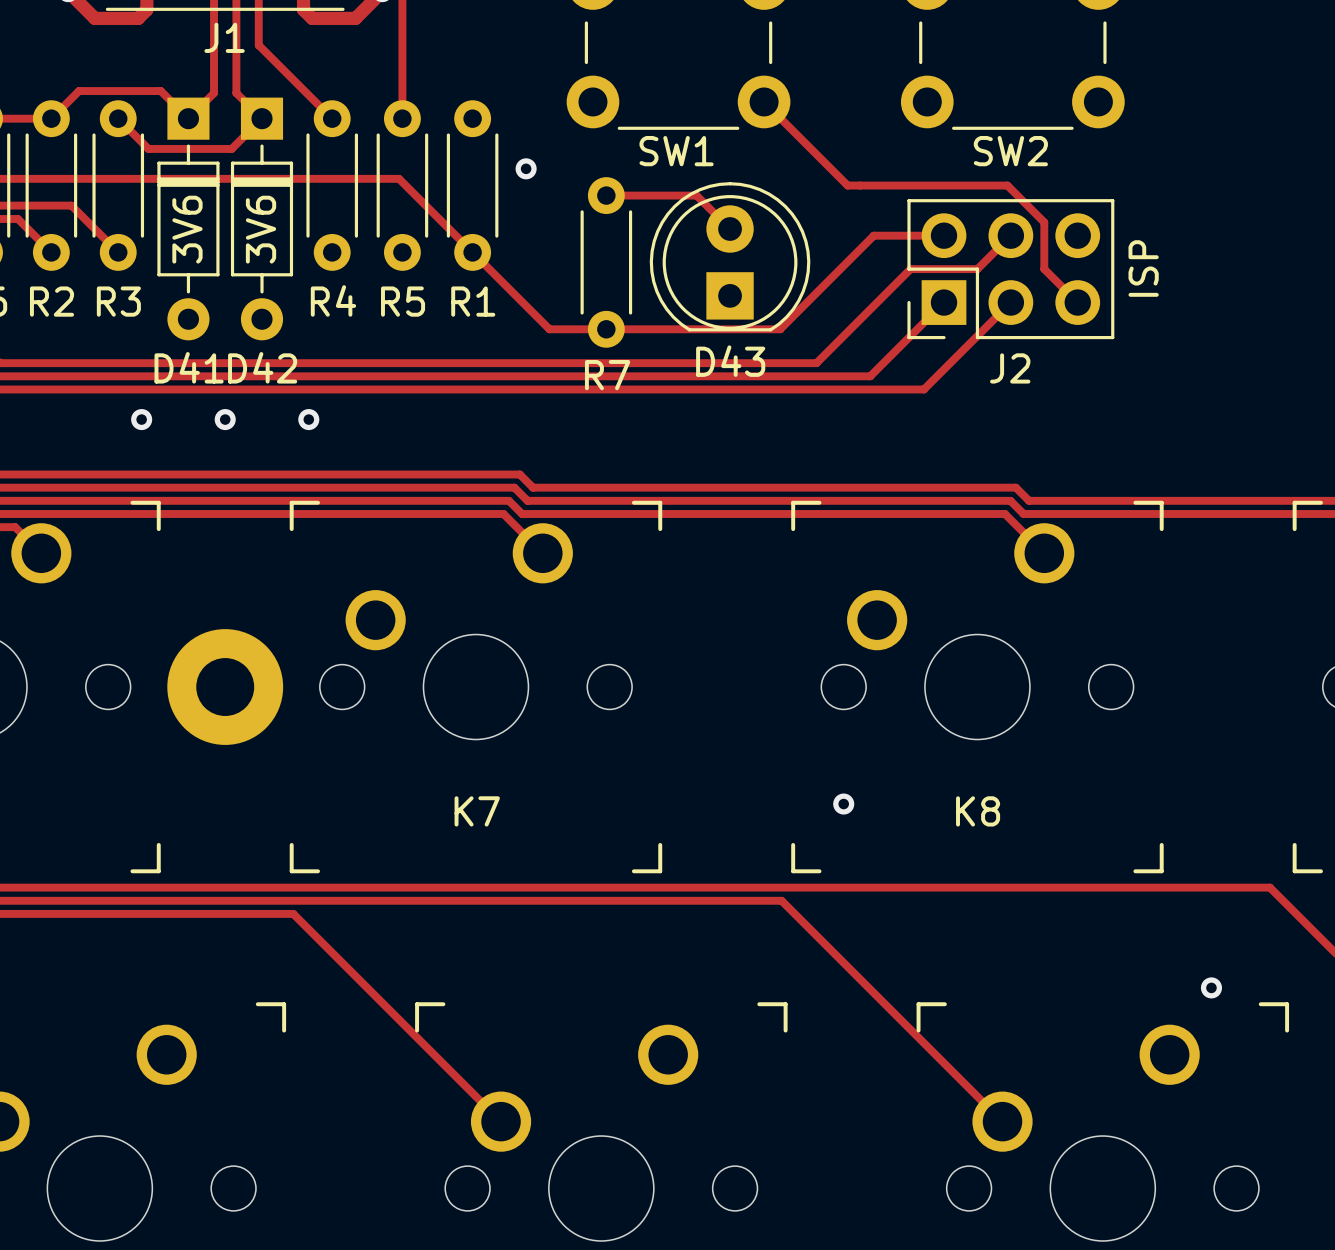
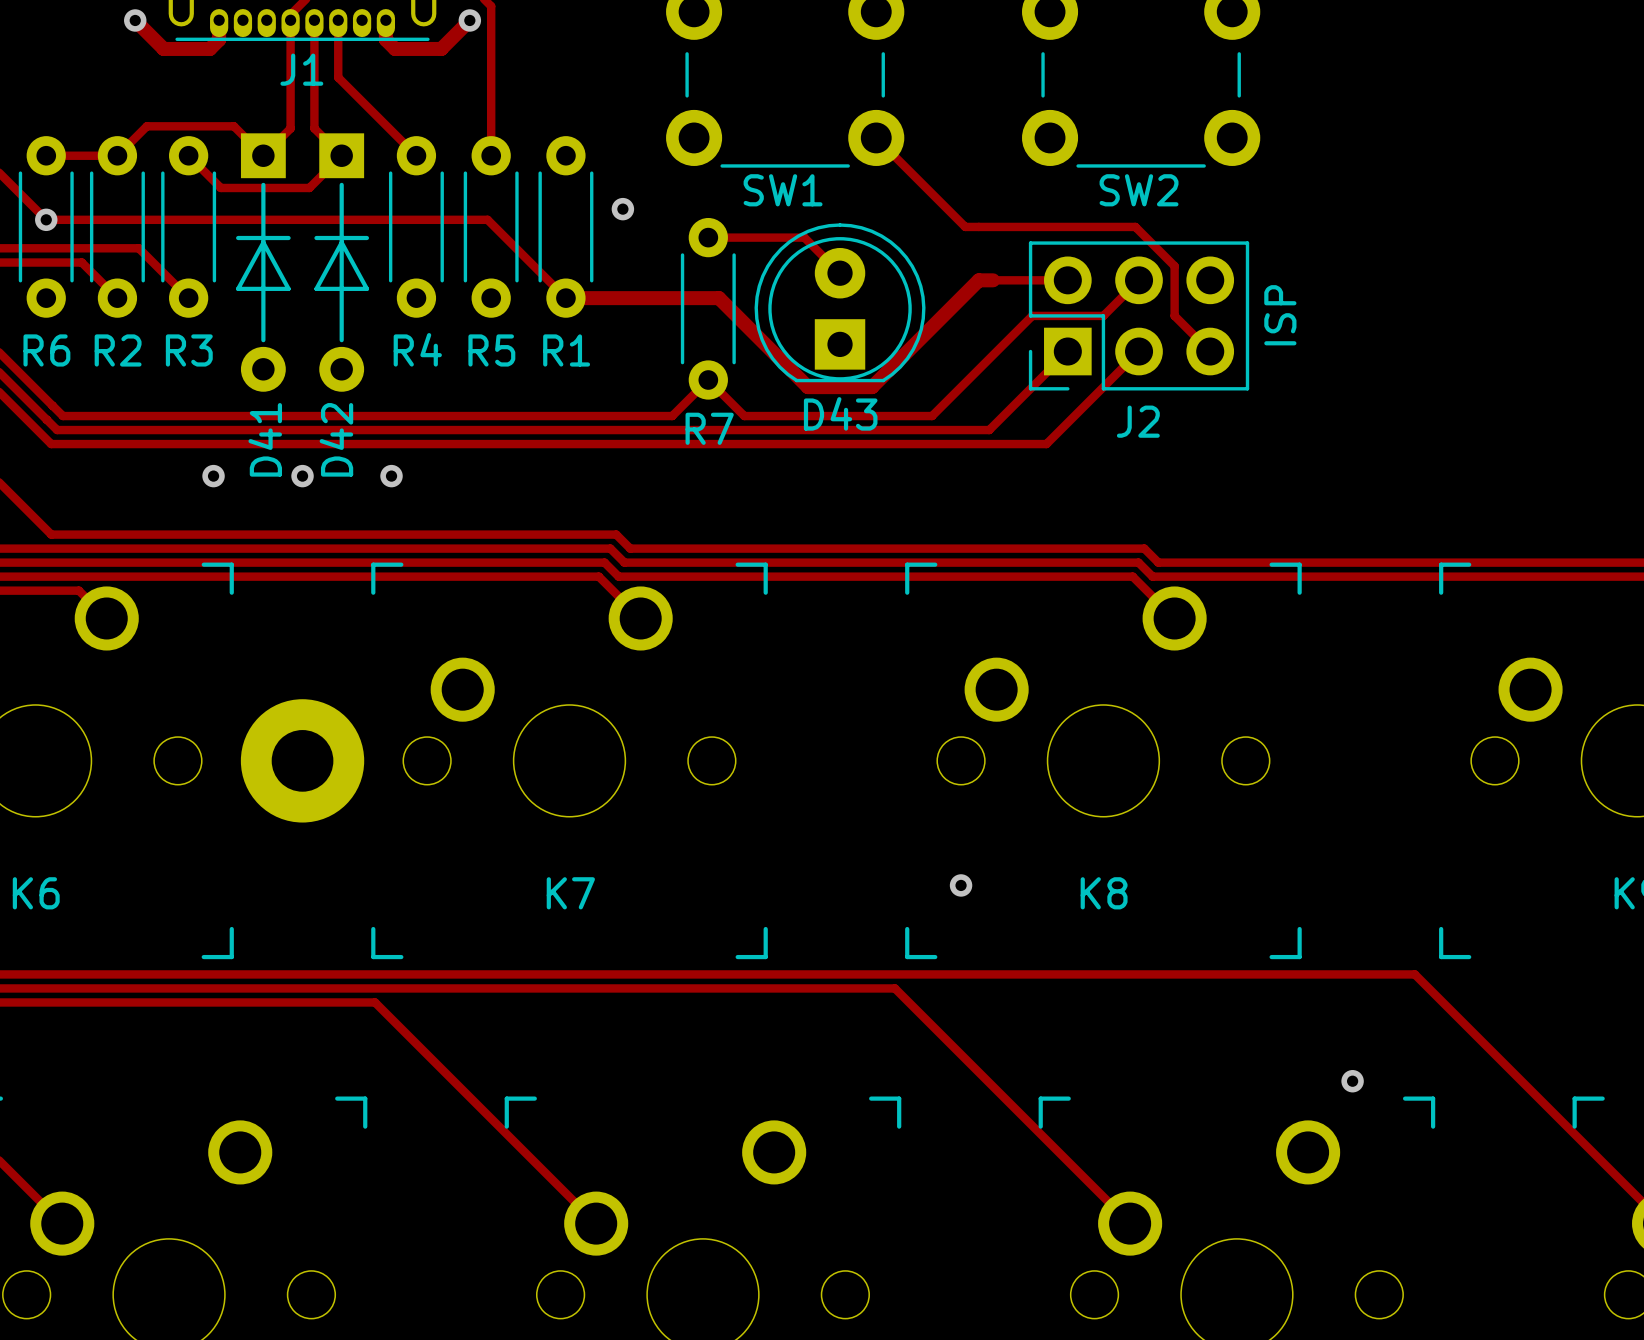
D41 footprint: [157, 97, 220, 341] -> [236, 133, 291, 392]
D42 footprint: [230, 97, 294, 341] -> [314, 133, 370, 392]
text: 3V6 (187, 229) -> none
text: 3V6 (261, 229) -> none
track: (873, 235) (780, 329) (549, 329) (472, 252) -> (993, 280) (978, 280) (872, 387) (807, 387) (719, 298) (565, 298)
track: (572, 363) (640, 363) -> (672, 416) (708, 379) (744, 416)

